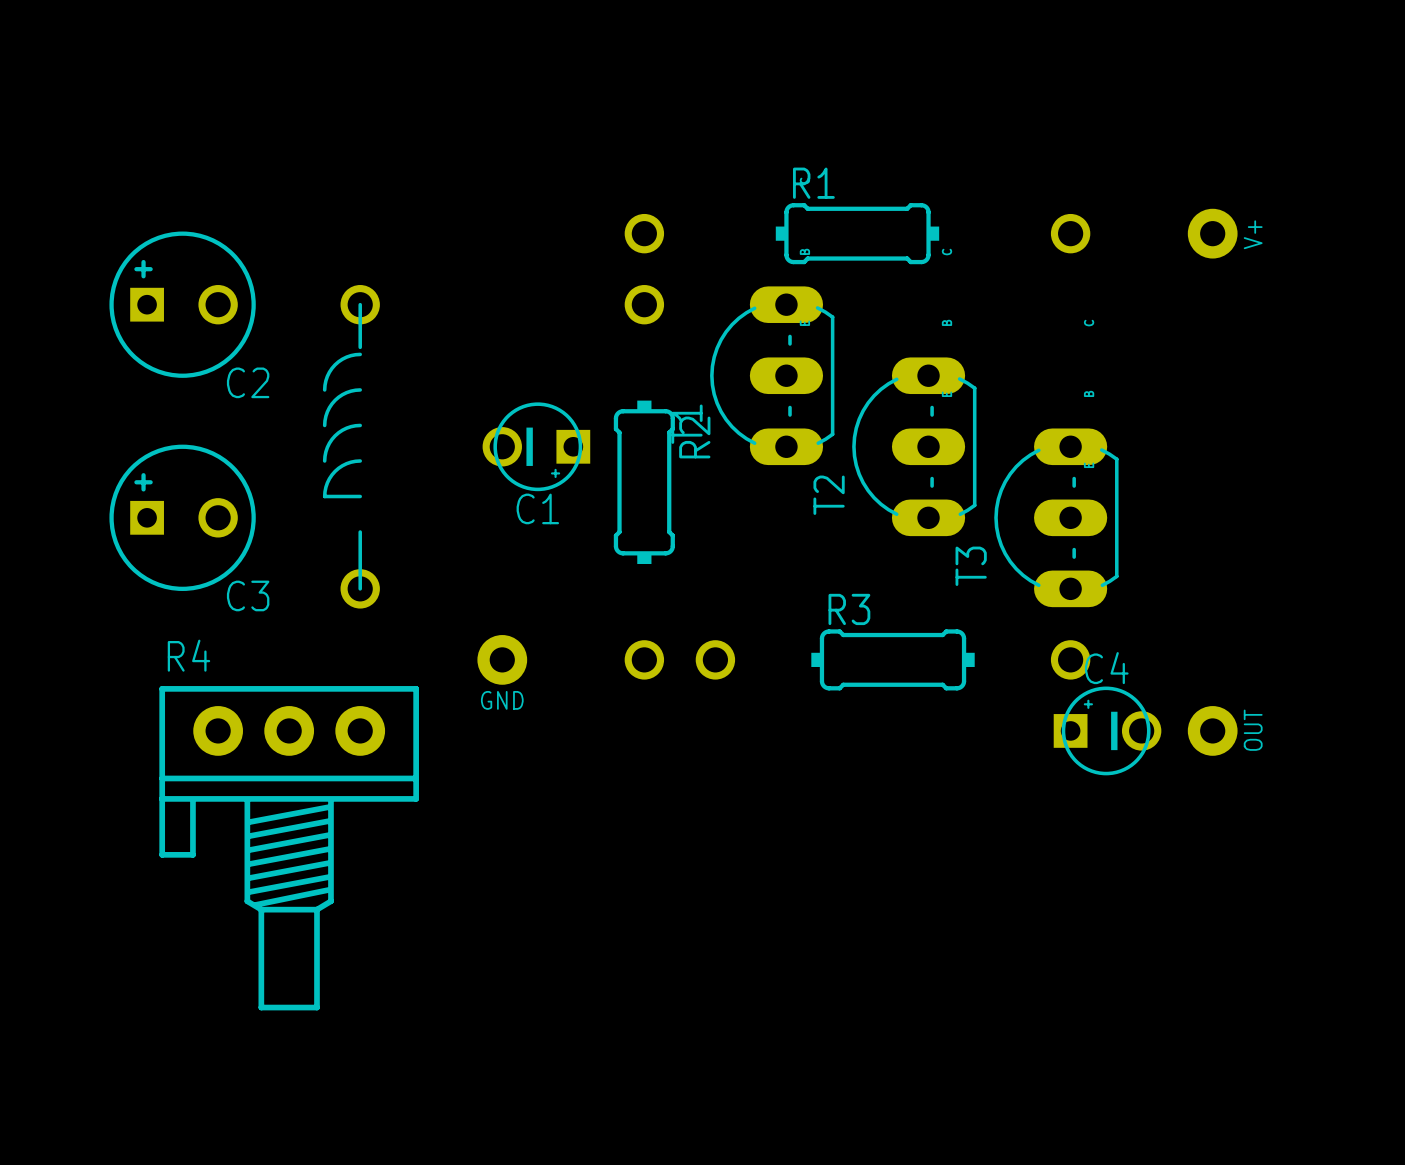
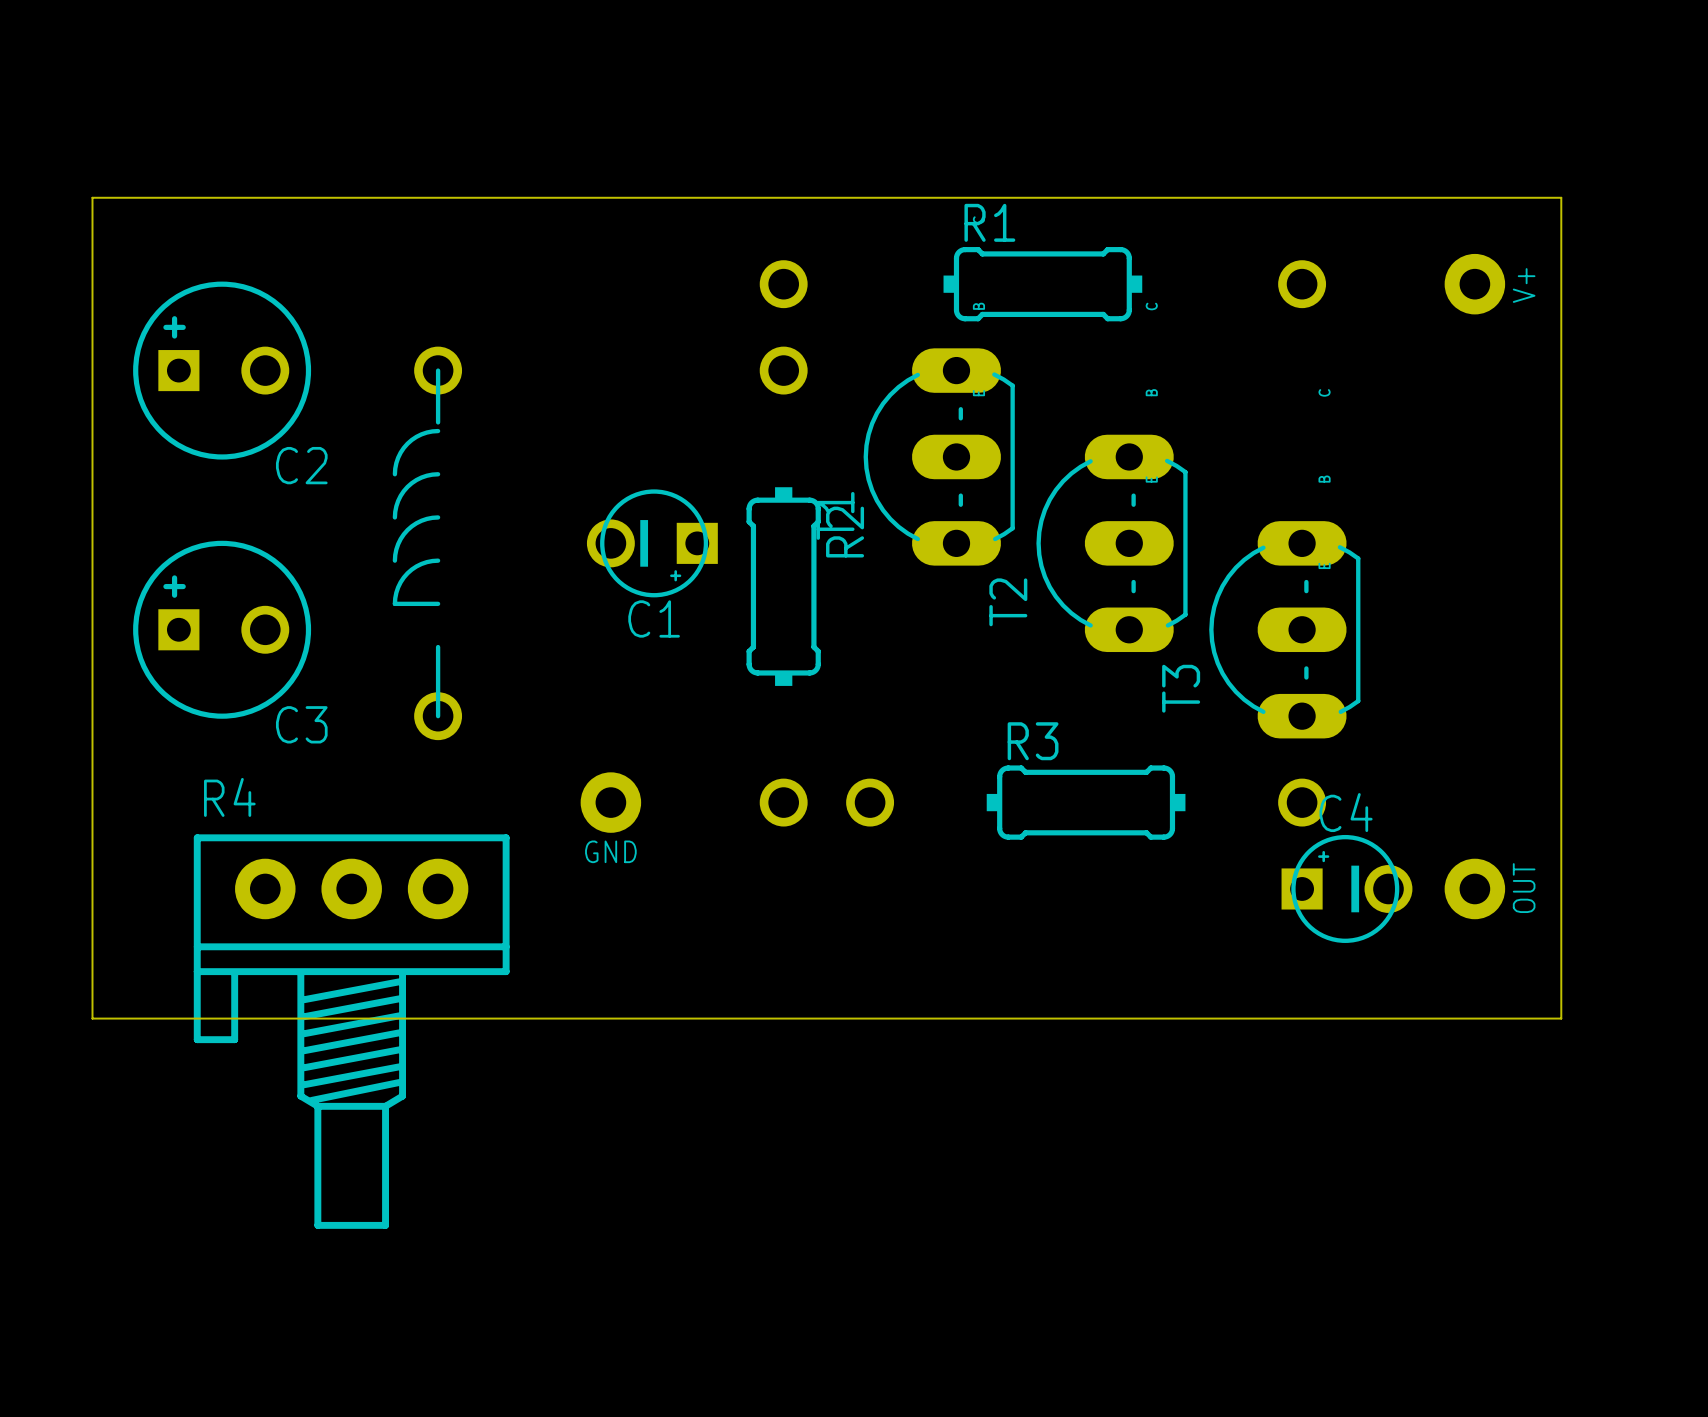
board edge: none -> (92, 197) (1561, 197) (1561, 1018) (92, 1018) (92, 197)

